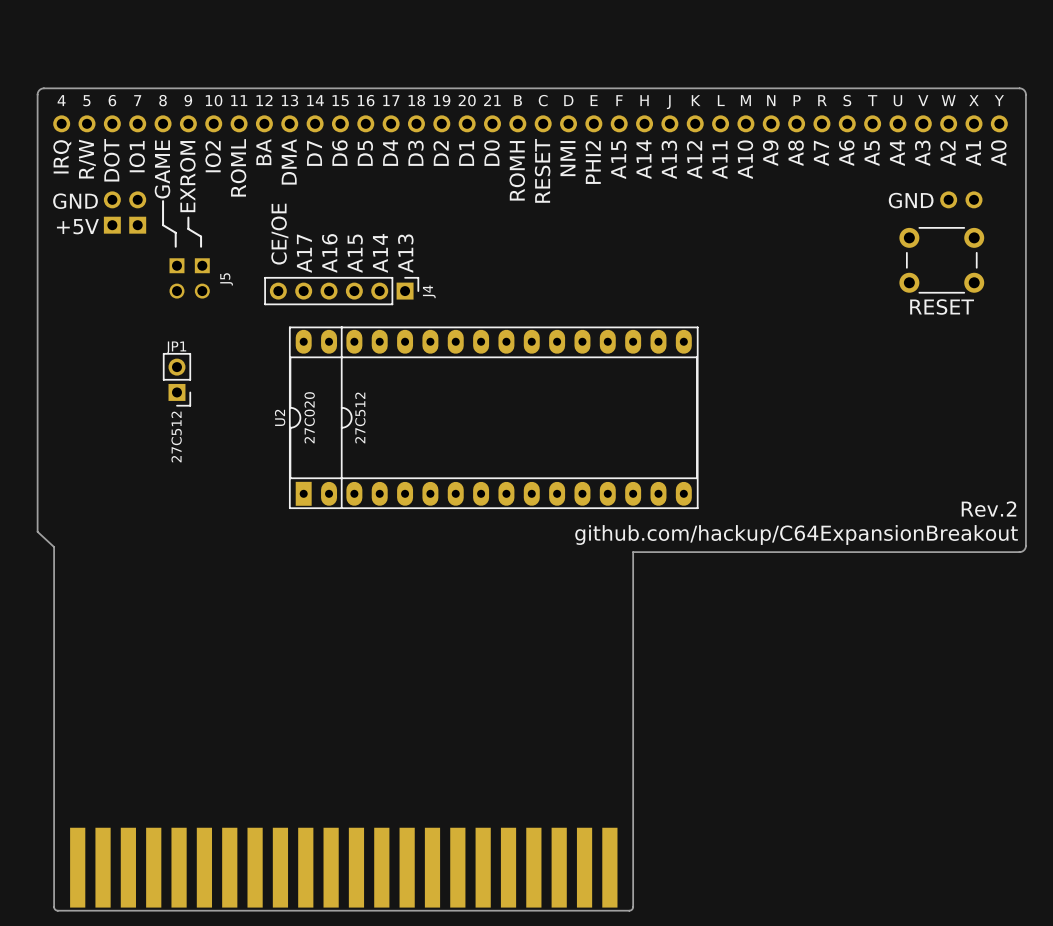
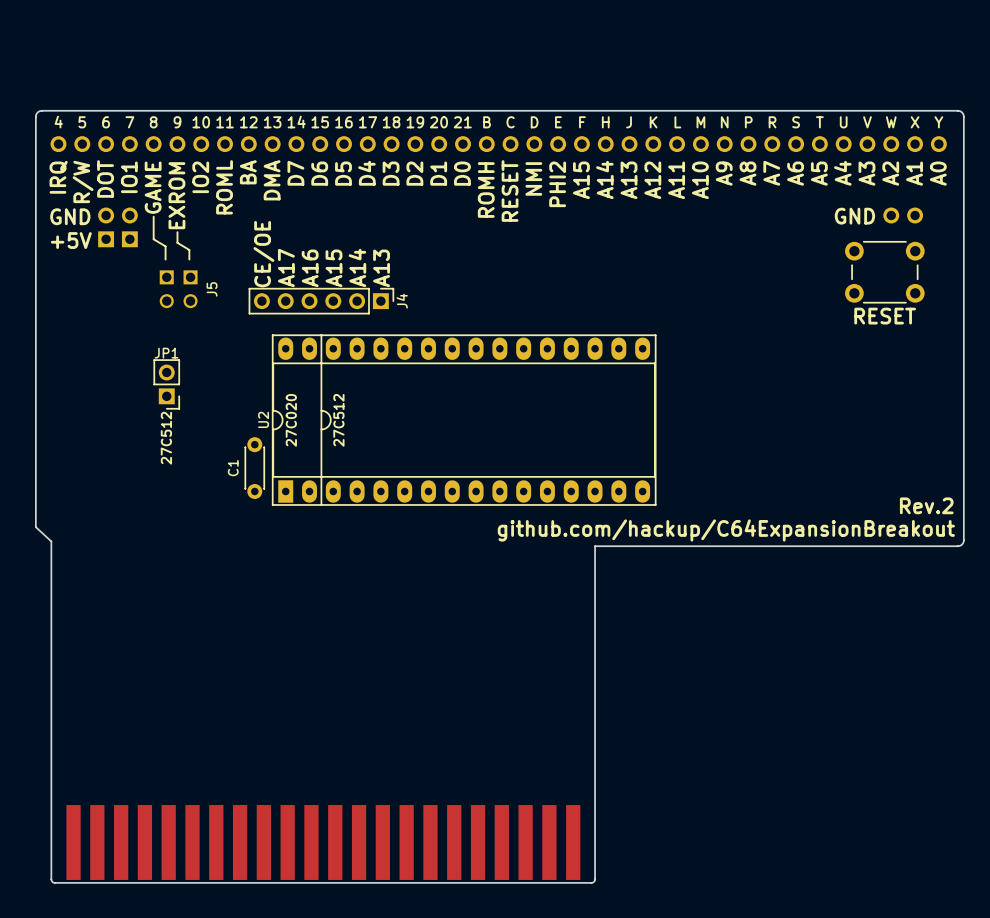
C1: none -> (254, 468)

